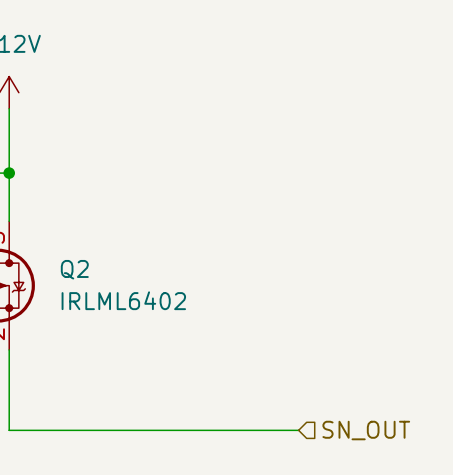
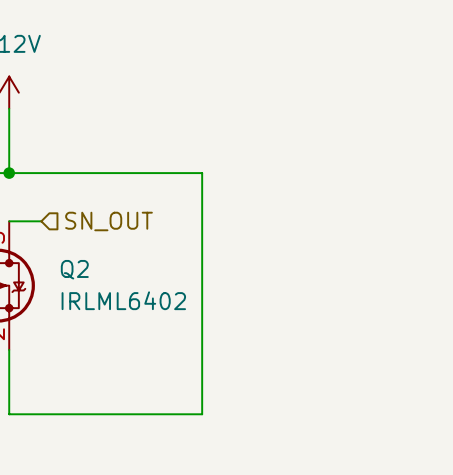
wire: (9, 173) (9, 221) -> (41, 221) (9, 221)
hierarchical label: none -> SN_OUT (109, 221)
wire: (9, 414) (9, 430) (298, 430) -> (9, 414) (202, 414) (202, 173) (9, 173)
hierarchical label: SN_OUT (366, 430) -> none

